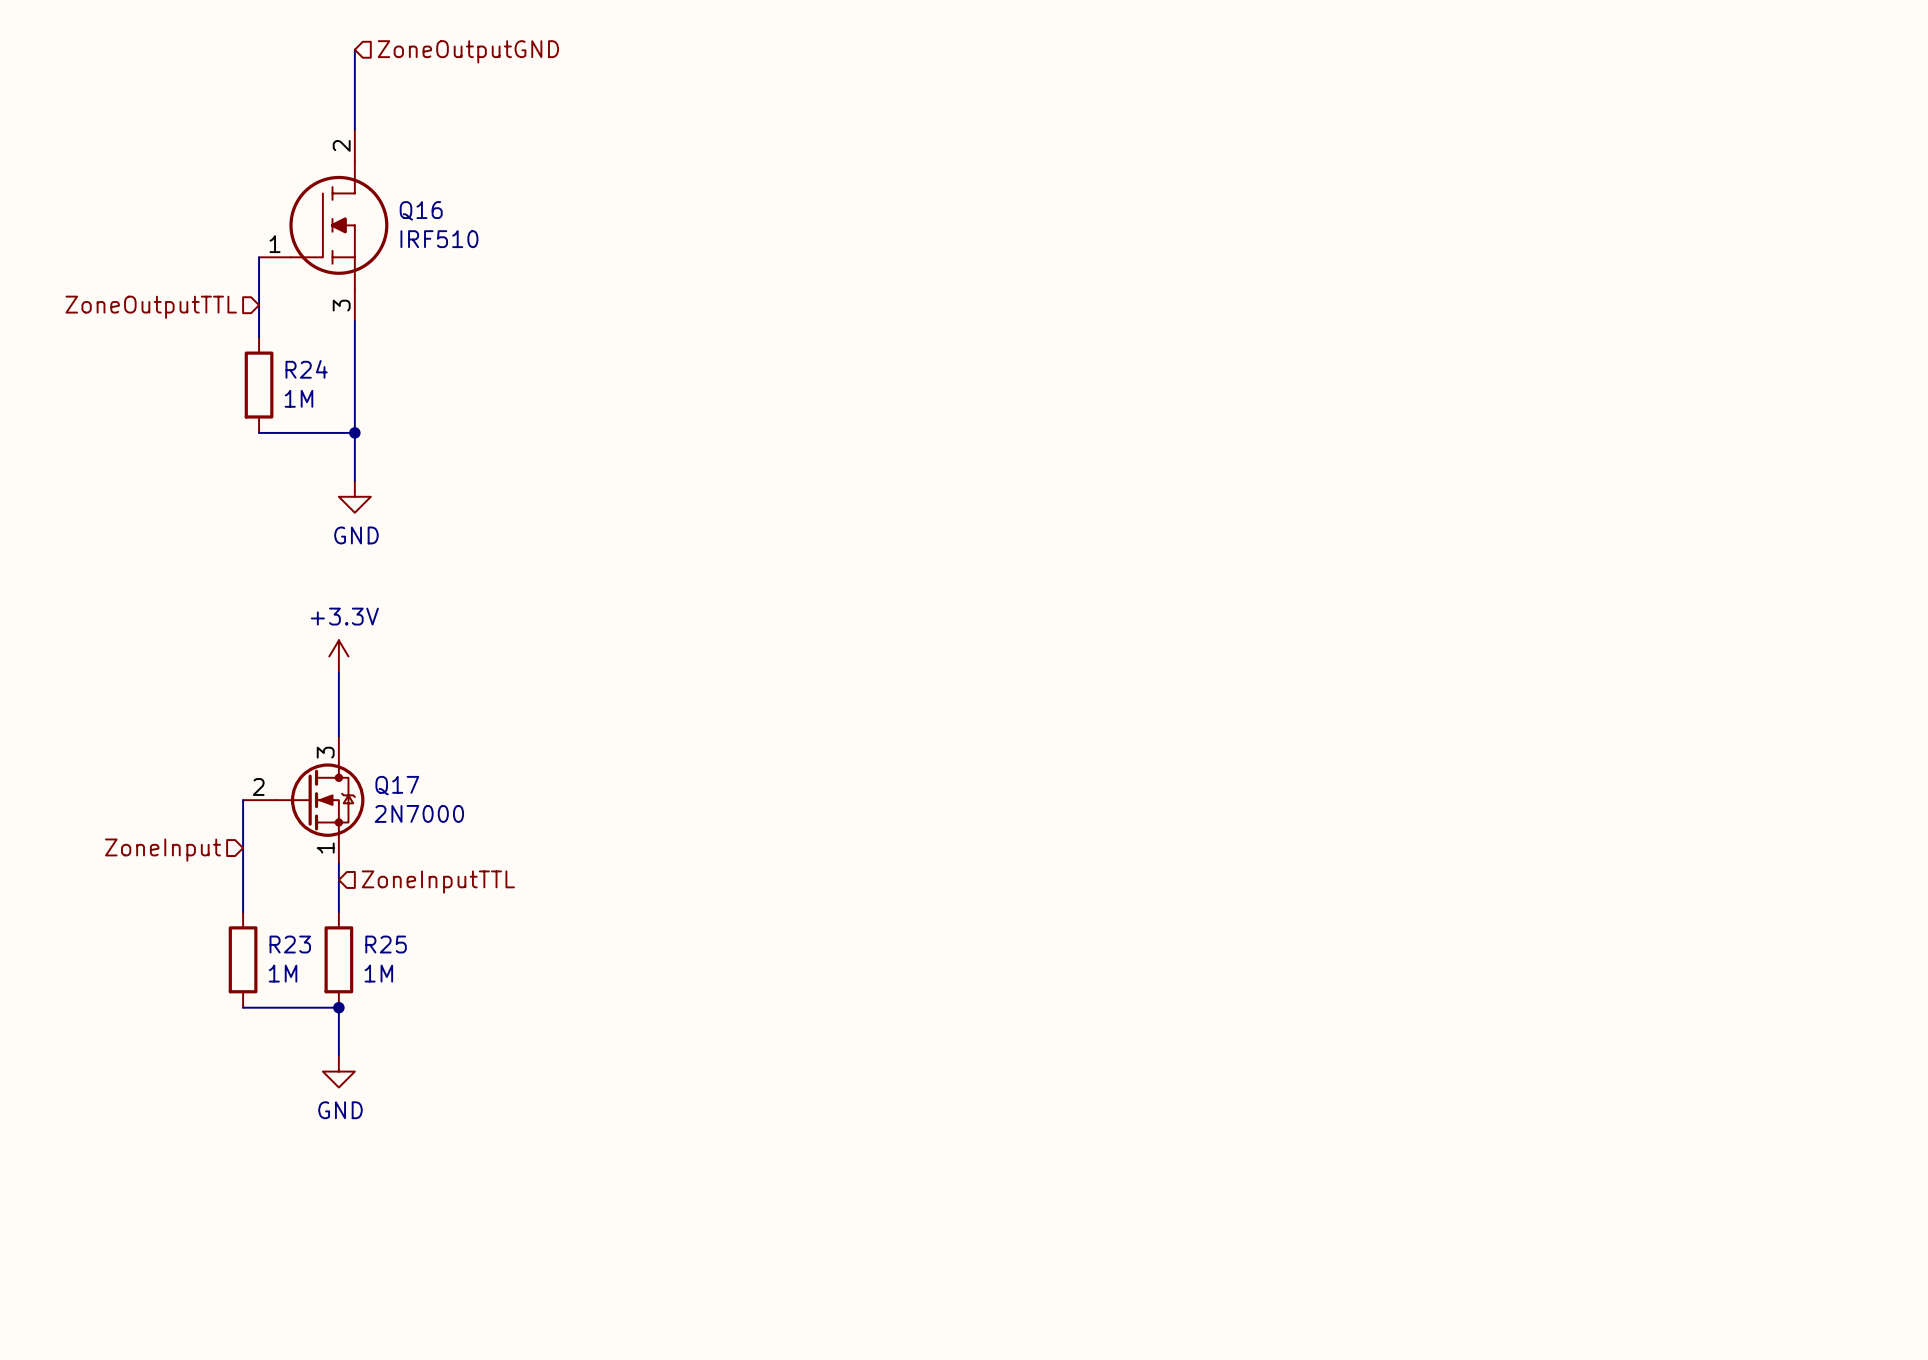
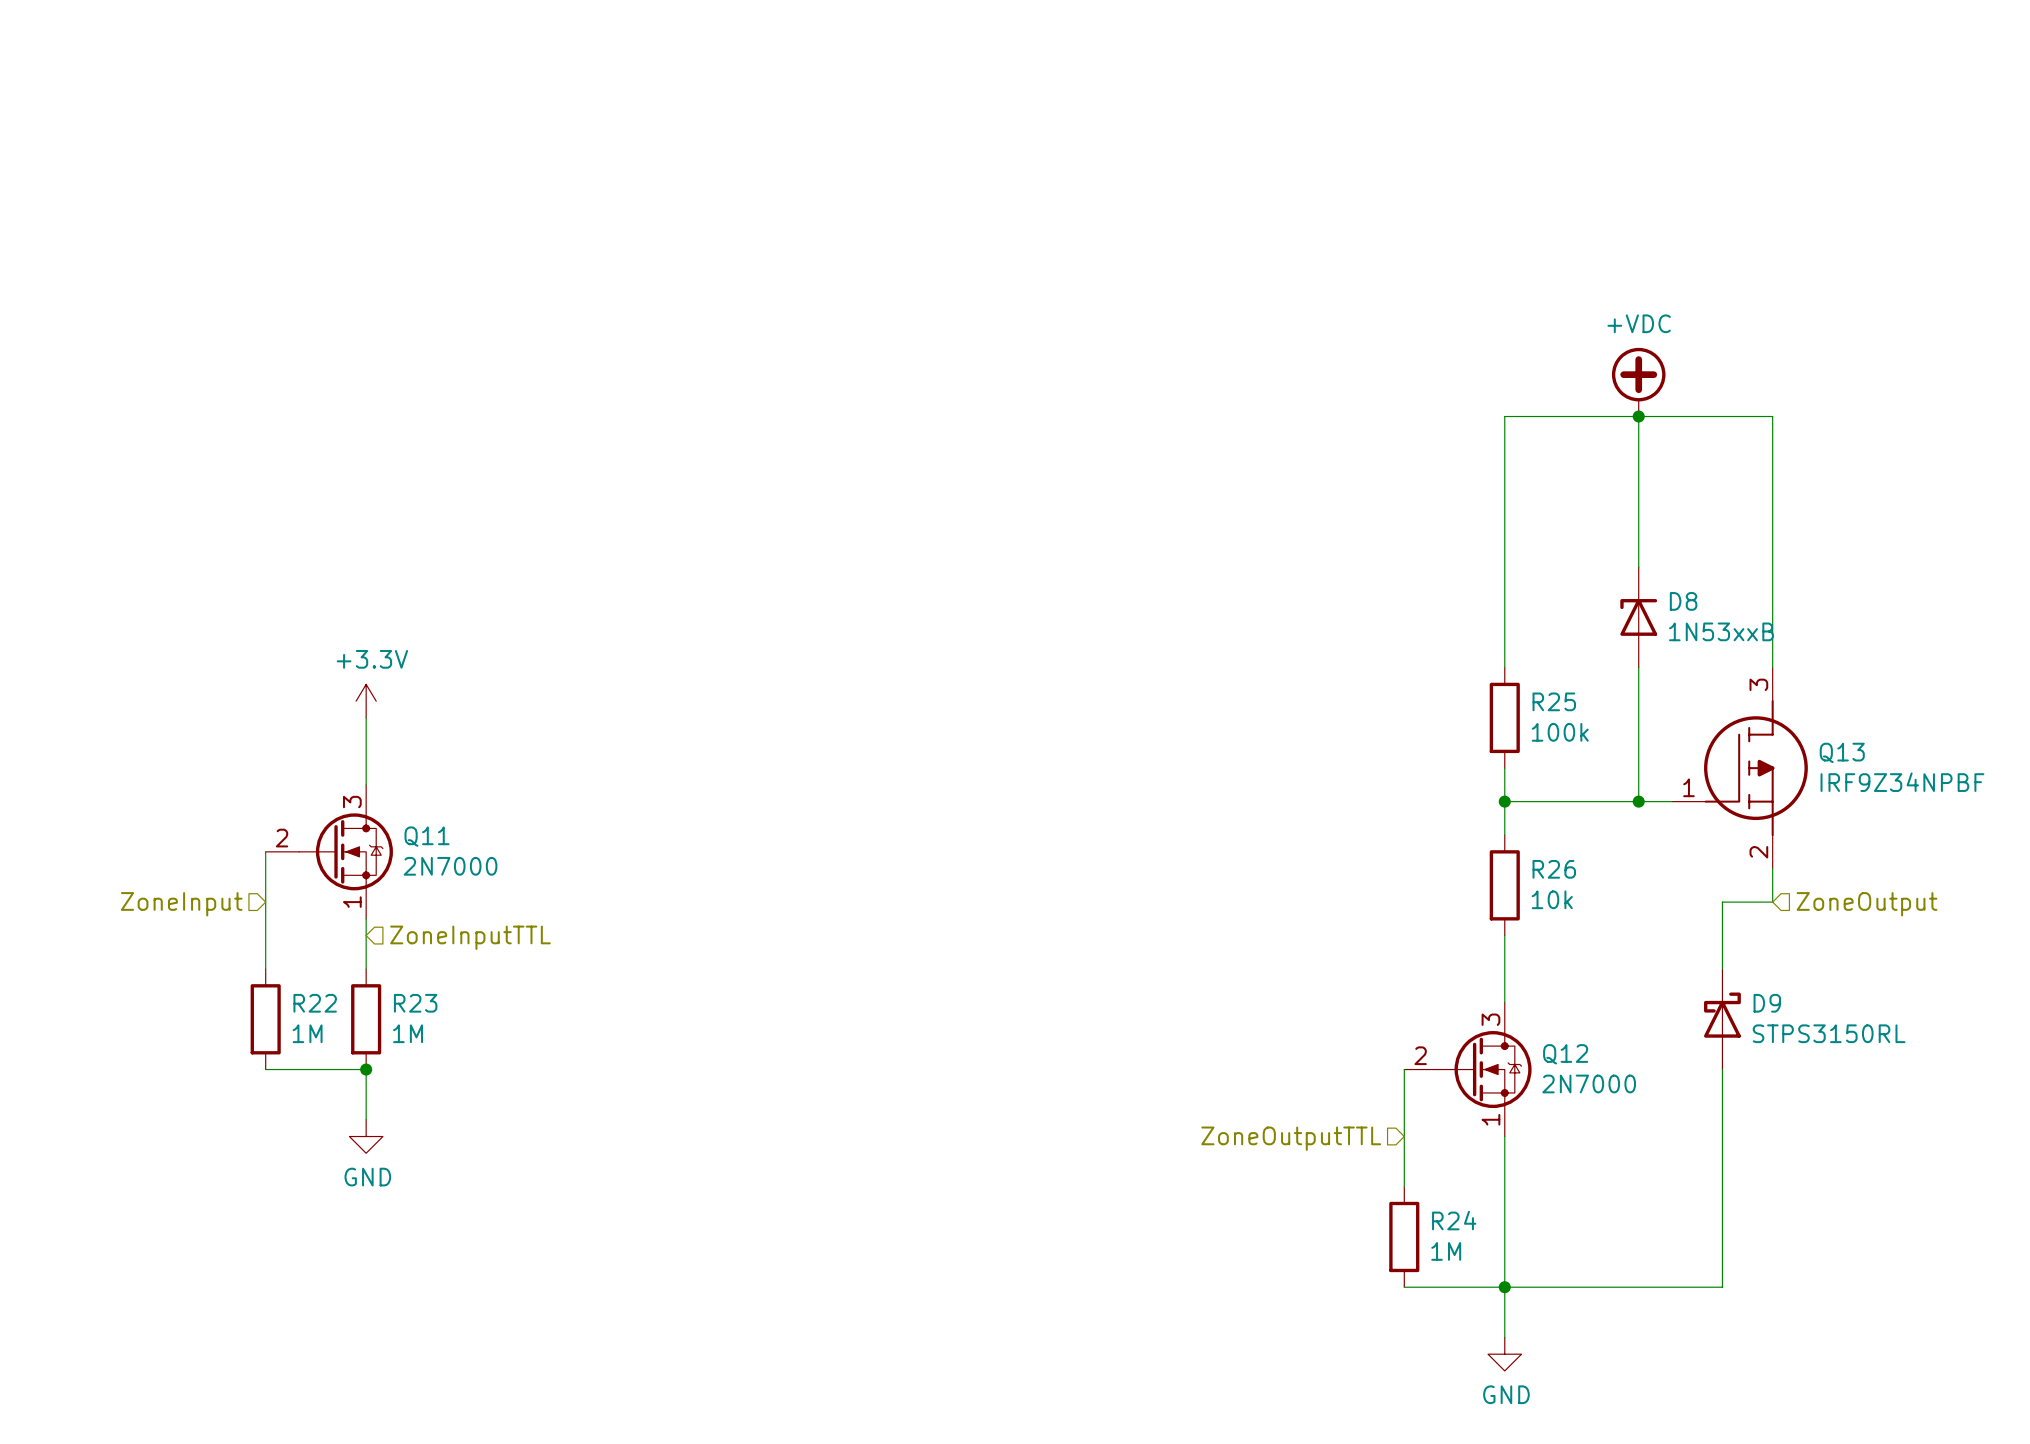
wire: (354, 49) (354, 129) -> none
hierarchical label: ZoneOutputGND (468, 51) -> none
Q16: IRF510 (323, 225) -> none
wire: (259, 257) (259, 337) -> none
hierarchical label: ZoneOutputTTL (151, 307) -> none
wire: (354, 321) (354, 480) -> none
power symbol: none -> +VDC (1638, 382)
R24 position: (259, 385) -> (1404, 1236)
wire: none -> (1638, 416) (1638, 567)
junction: none -> (1638, 416)
wire: (259, 432) (354, 432) -> none
junction: (354, 432) -> none
power symbol: GND (354, 496) -> none
D8: none -> 1N53xxB (1638, 617)
wire: none -> (1504, 667) (1504, 416) (1772, 416) (1772, 667)
wire: none -> (1638, 667) (1638, 801)
R25: none -> 100k (1504, 717)
wire: none -> (1504, 768) (1504, 835)
Q13: none -> IRF9Z34NPBF (1740, 768)
wire: none -> (1504, 801) (1672, 801)
junction: none -> (1504, 801)
junction: none -> (1638, 801)
Q17 name: Q17 (397, 785) -> Q11 (427, 836)
wire: none -> (1772, 868) (1772, 902) (1722, 902) (1722, 969)
R26: none -> 10k (1504, 885)
hierarchical label: none -> ZoneOutput (1867, 904)
wire: none -> (1504, 935) (1504, 1002)
R23 name: R23 (290, 944) -> R22 (315, 1003)
R25 name: R25 (386, 944) -> R23 (415, 1003)
D9: none -> STPS3150RL (1722, 1019)
wire: none -> (1404, 1069) (1404, 1186)
Q12: none -> 2N7000 (1467, 1069)
wire: none -> (1722, 1069) (1722, 1287) (1404, 1287)
wire: none -> (1504, 1136) (1504, 1337)
hierarchical label: none -> ZoneOutputTTL (1291, 1138)
junction: none -> (1504, 1287)
power symbol: none -> GND (1504, 1354)

